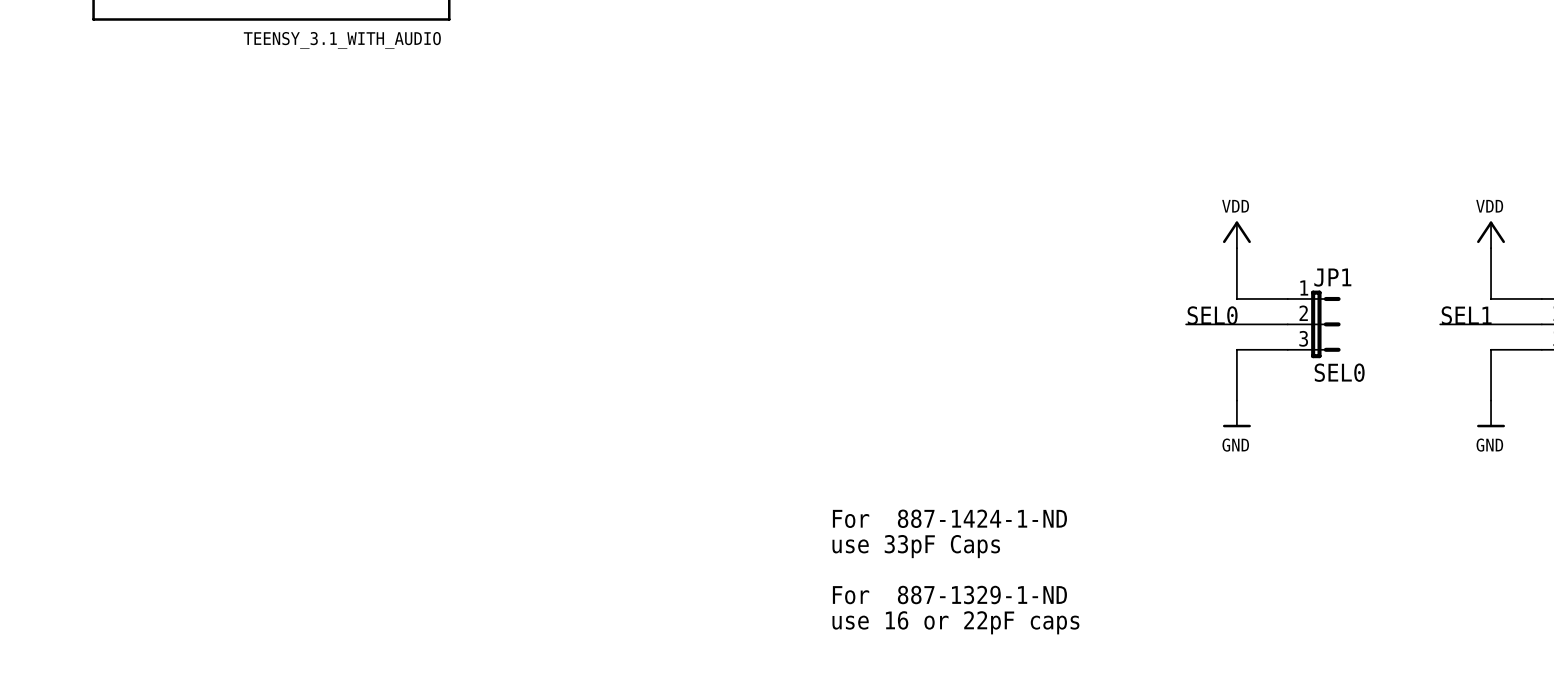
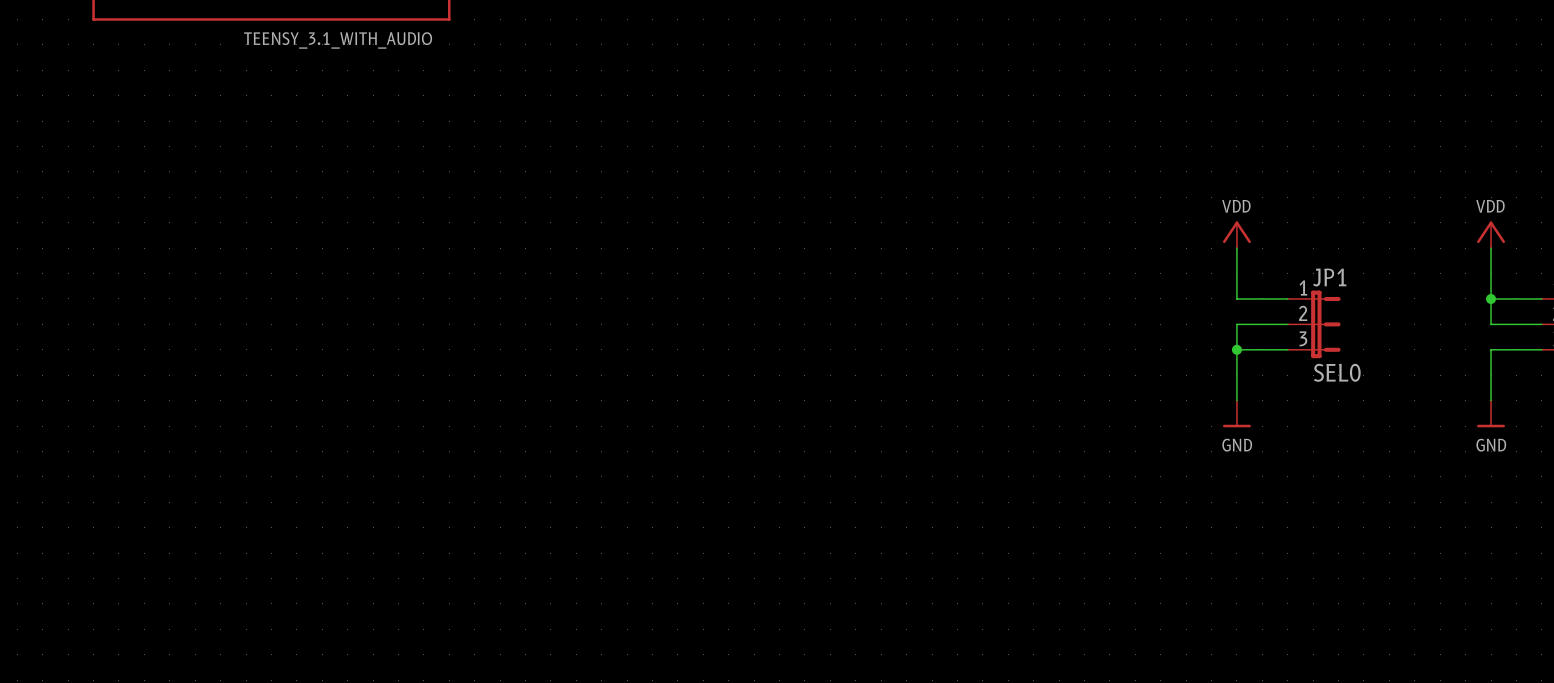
junction: none -> (1491, 298)
label: SEL0 (1212, 315) -> none
label: SEL1 (1466, 315) -> none
wire: (1186, 324) (1236, 324) -> (1236, 349) (1236, 324)
wire: (1440, 324) (1491, 324) -> (1491, 298) (1491, 324)
junction: none -> (1236, 349)
text: For 887-1424-1-ND (949, 518) -> none
text: use 33pF Caps (916, 546) -> none
text: For 887-1329-1-ND (949, 595) -> none
text: use 16 or 22pF caps (955, 622) -> none

